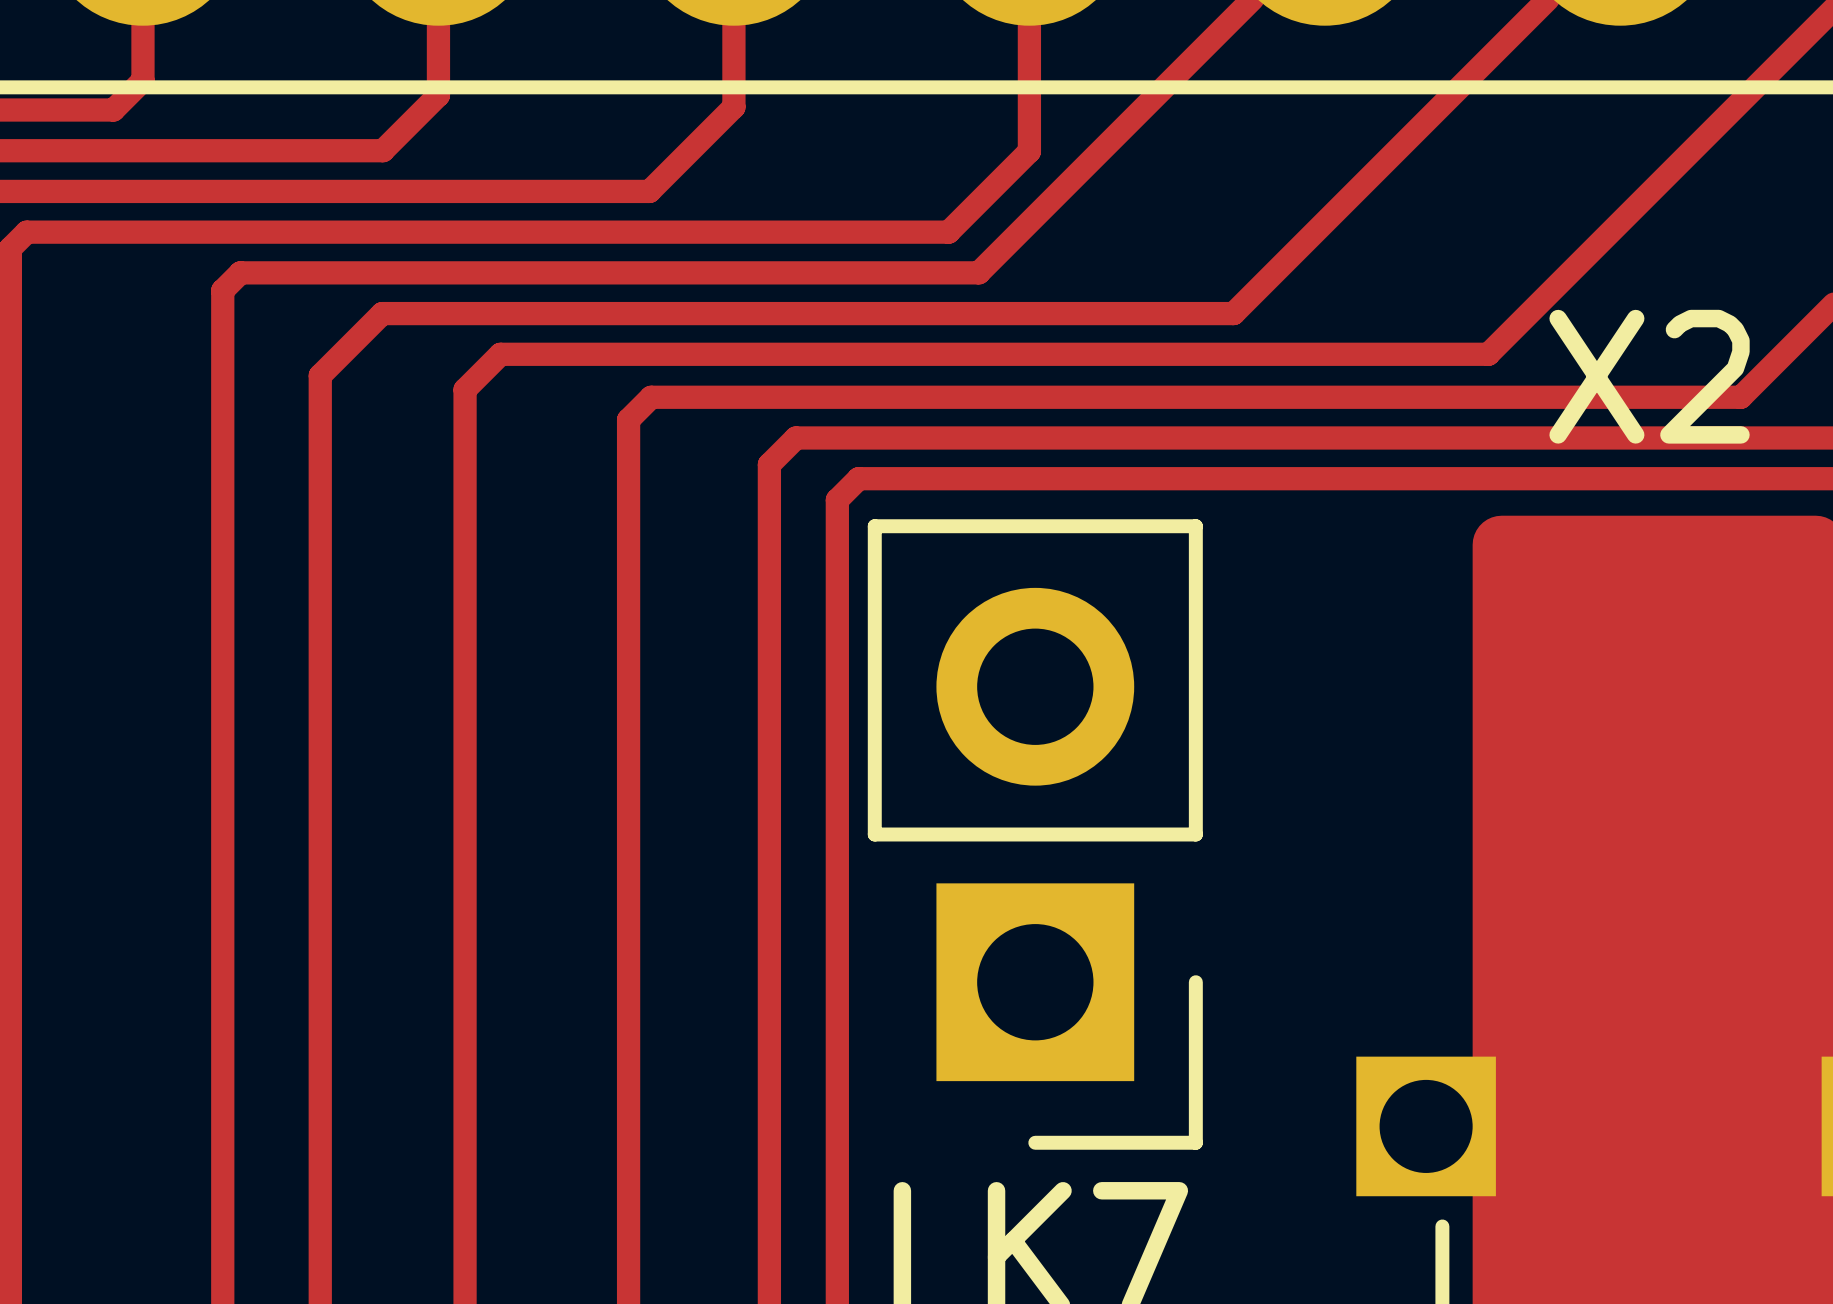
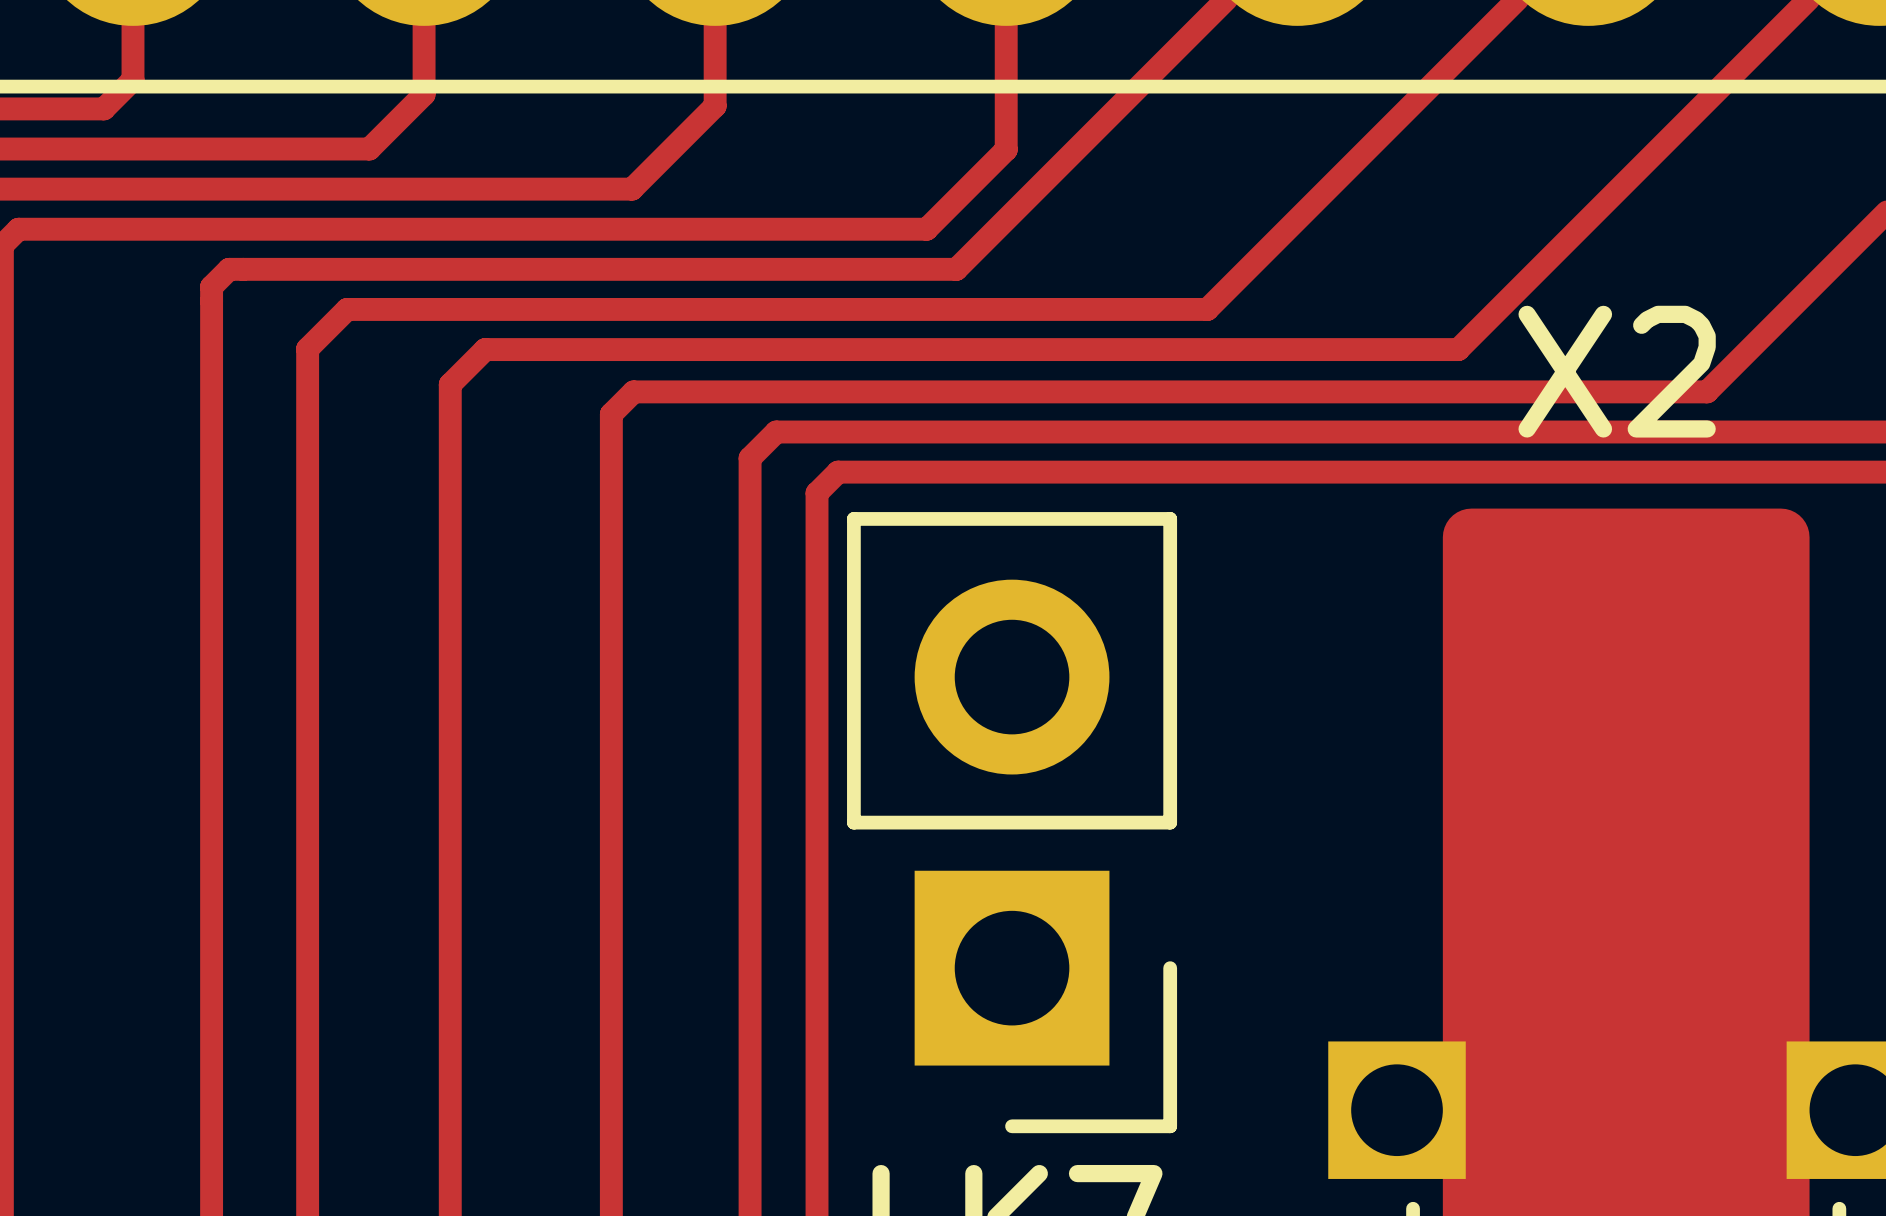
track: (382, 313) (320, 375) -> (368, 309) (347, 309) (307, 348) (307, 370)

